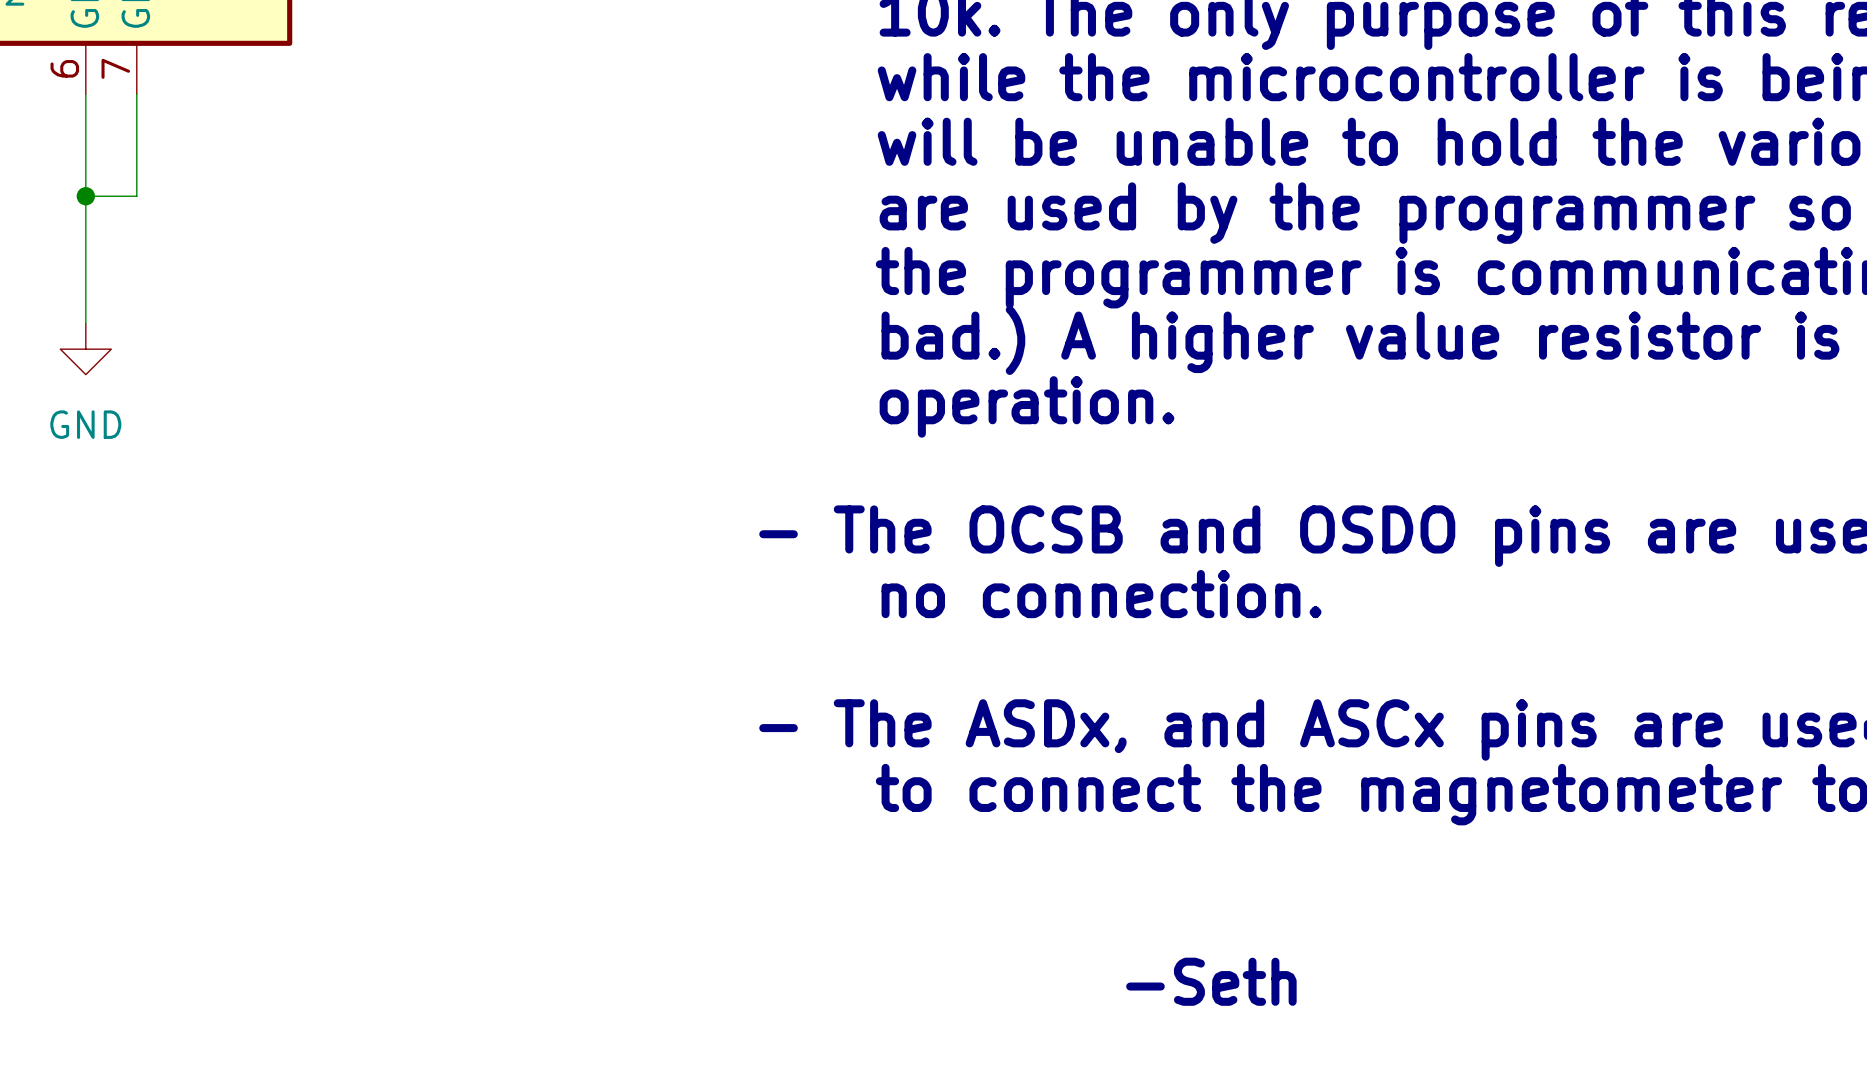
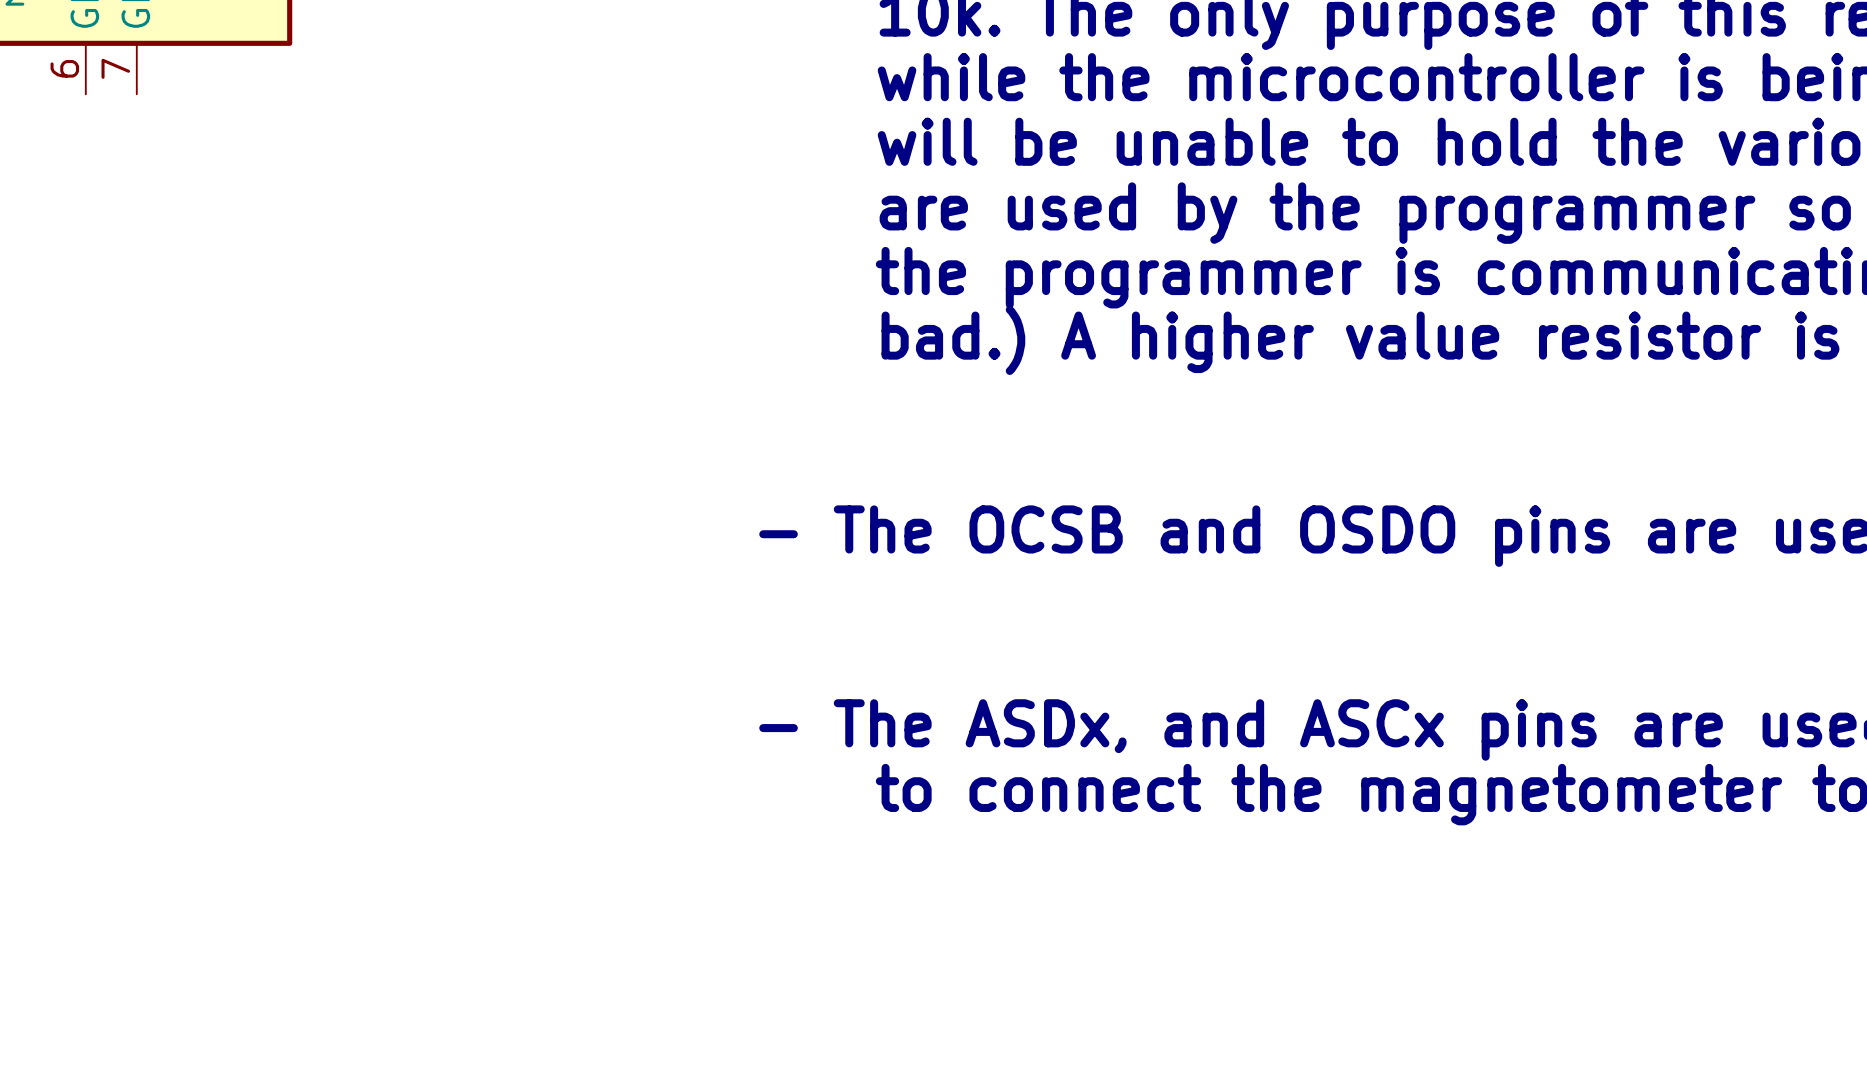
wire: (85, 94) (85, 323) -> none
wire: (136, 94) (136, 196) (85, 196) -> none
junction: (85, 196) -> none
power symbol: GND (85, 349) -> none
text: operation. (1026, 406) -> none
text: no connection. (1101, 594) -> none
text: -Seth (1211, 981) -> none

